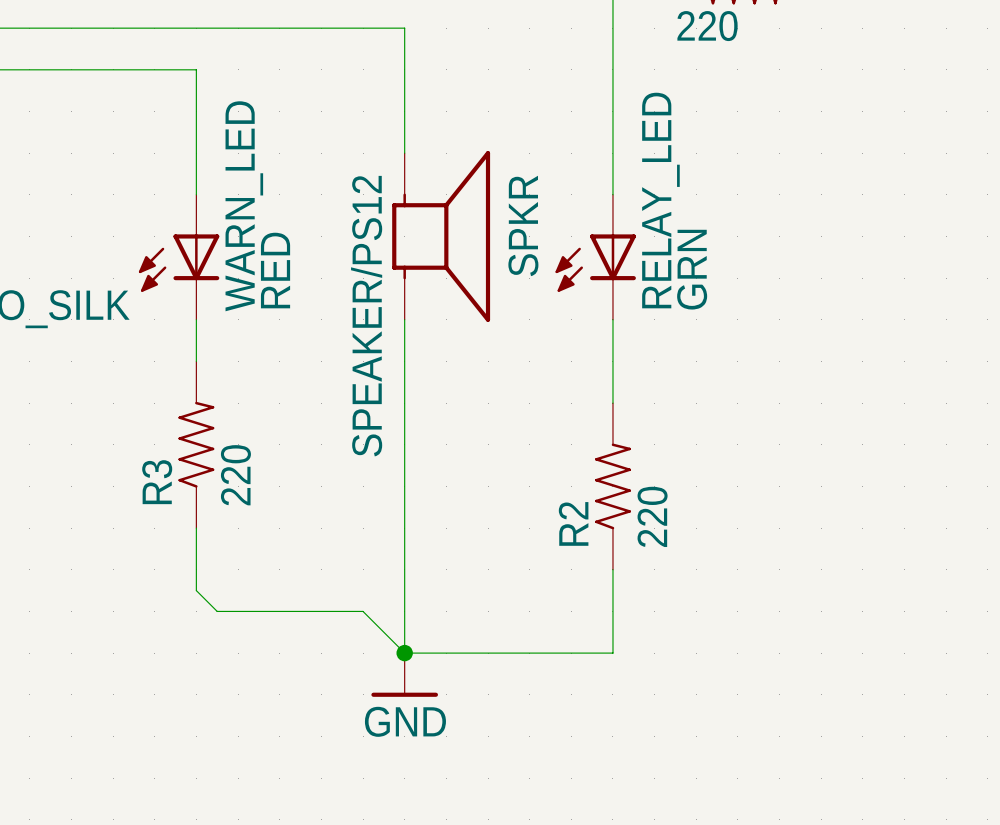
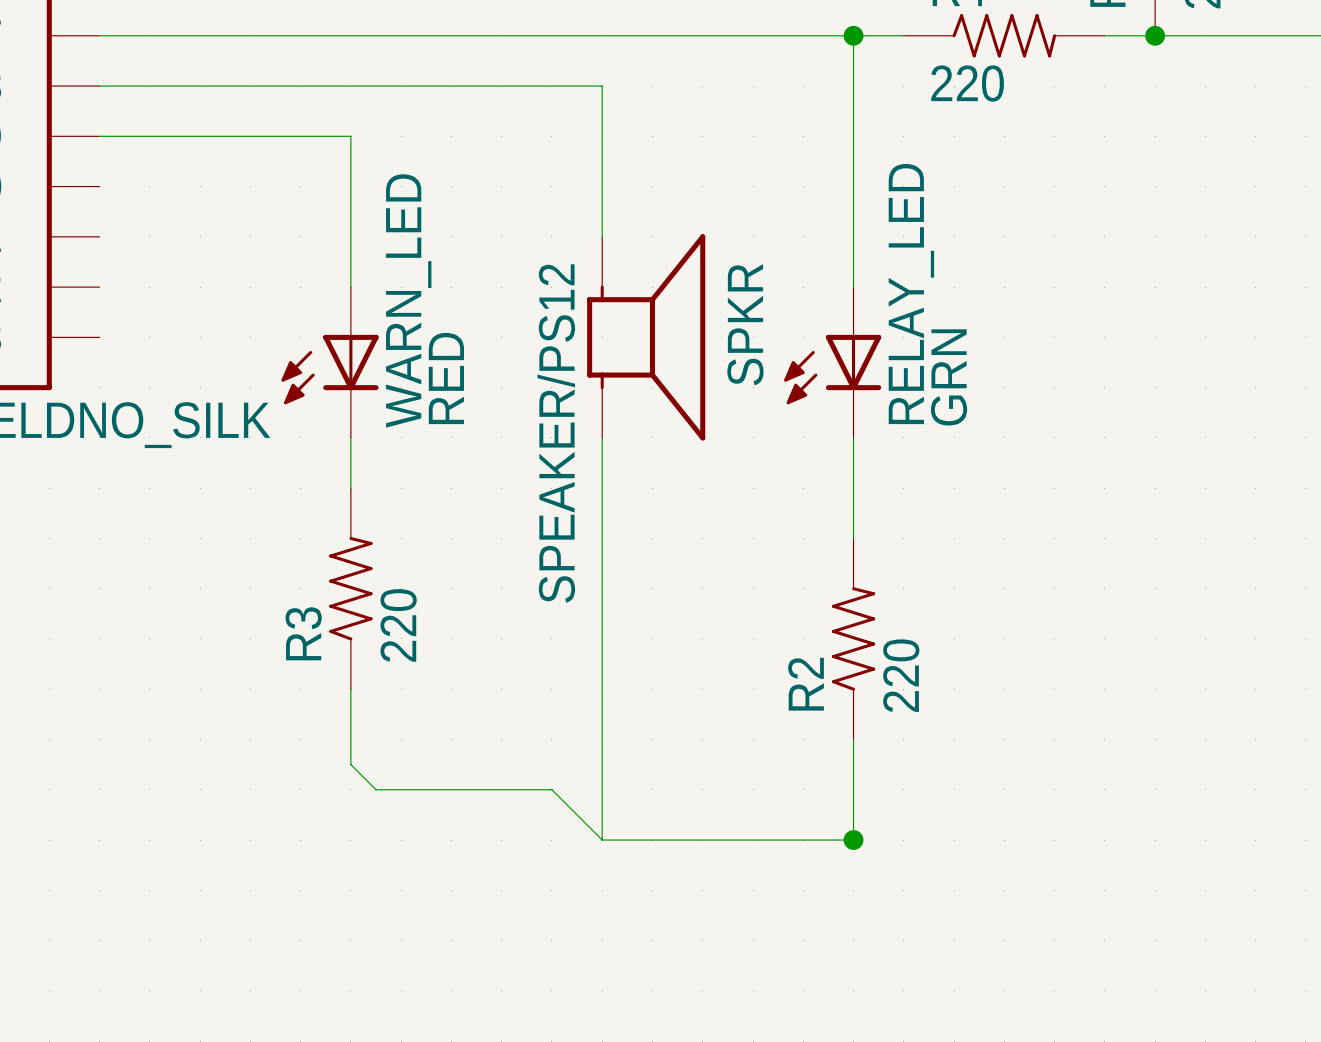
junction: (404, 653) -> none
junction: none -> (853, 840)
power symbol: GND (404, 674) -> none

